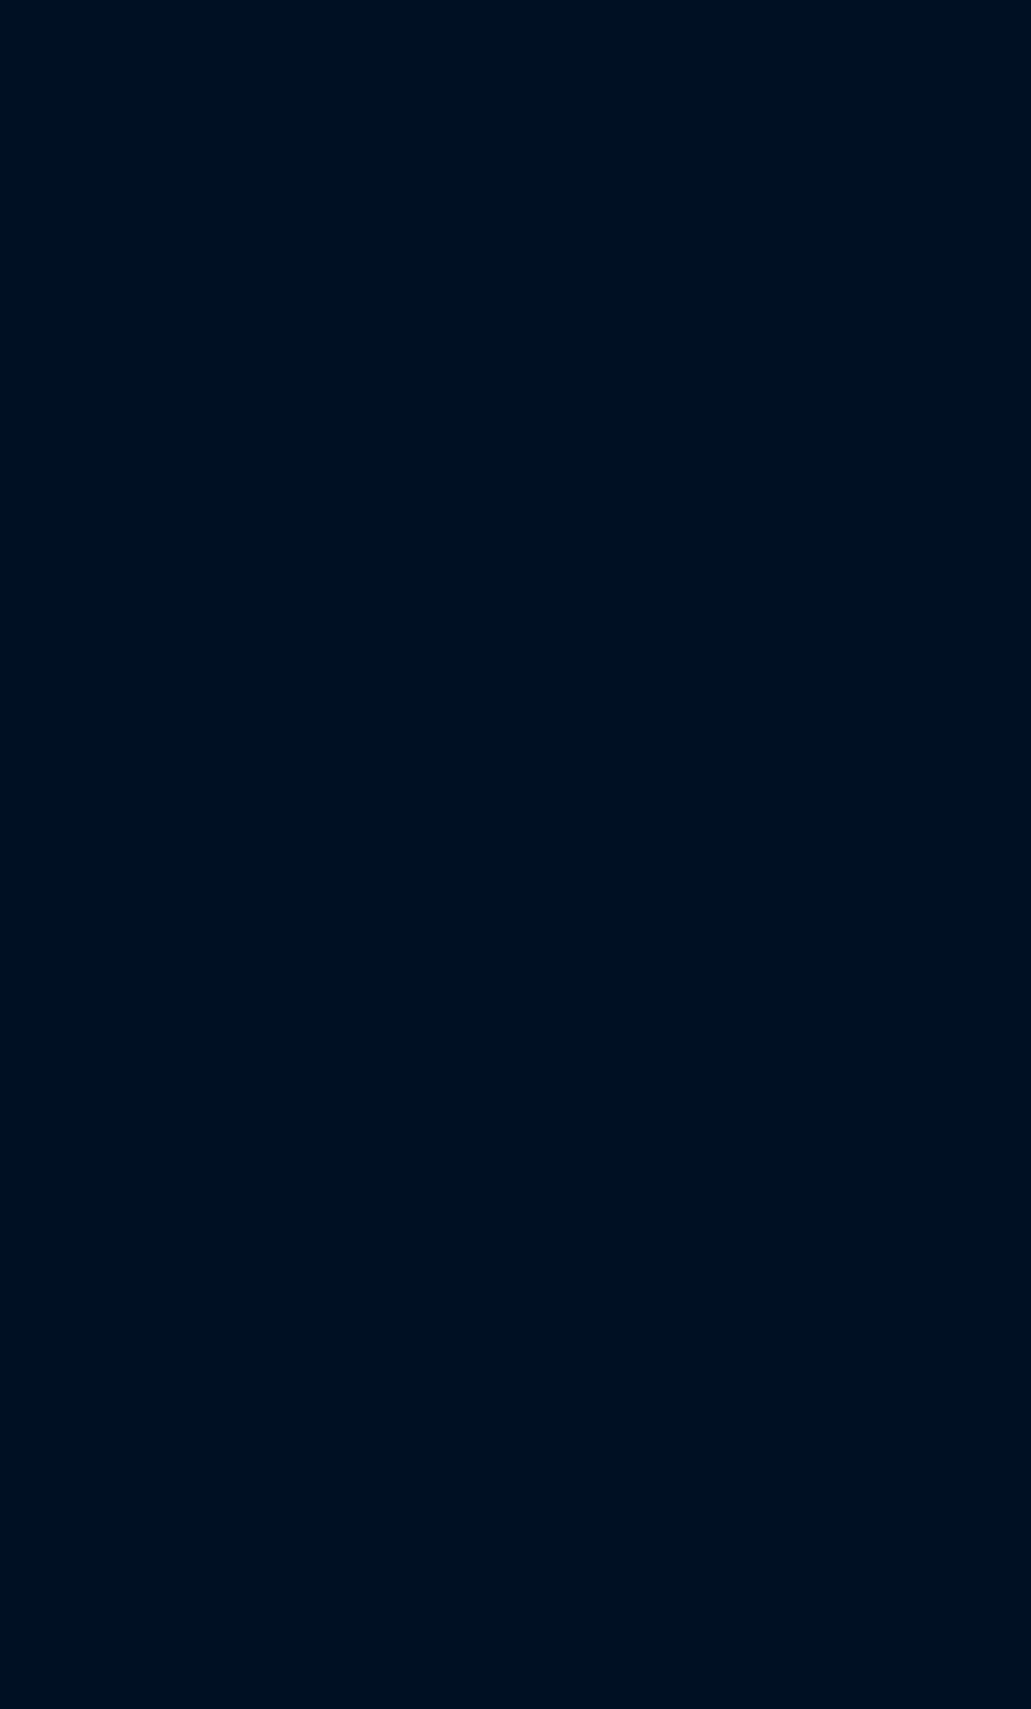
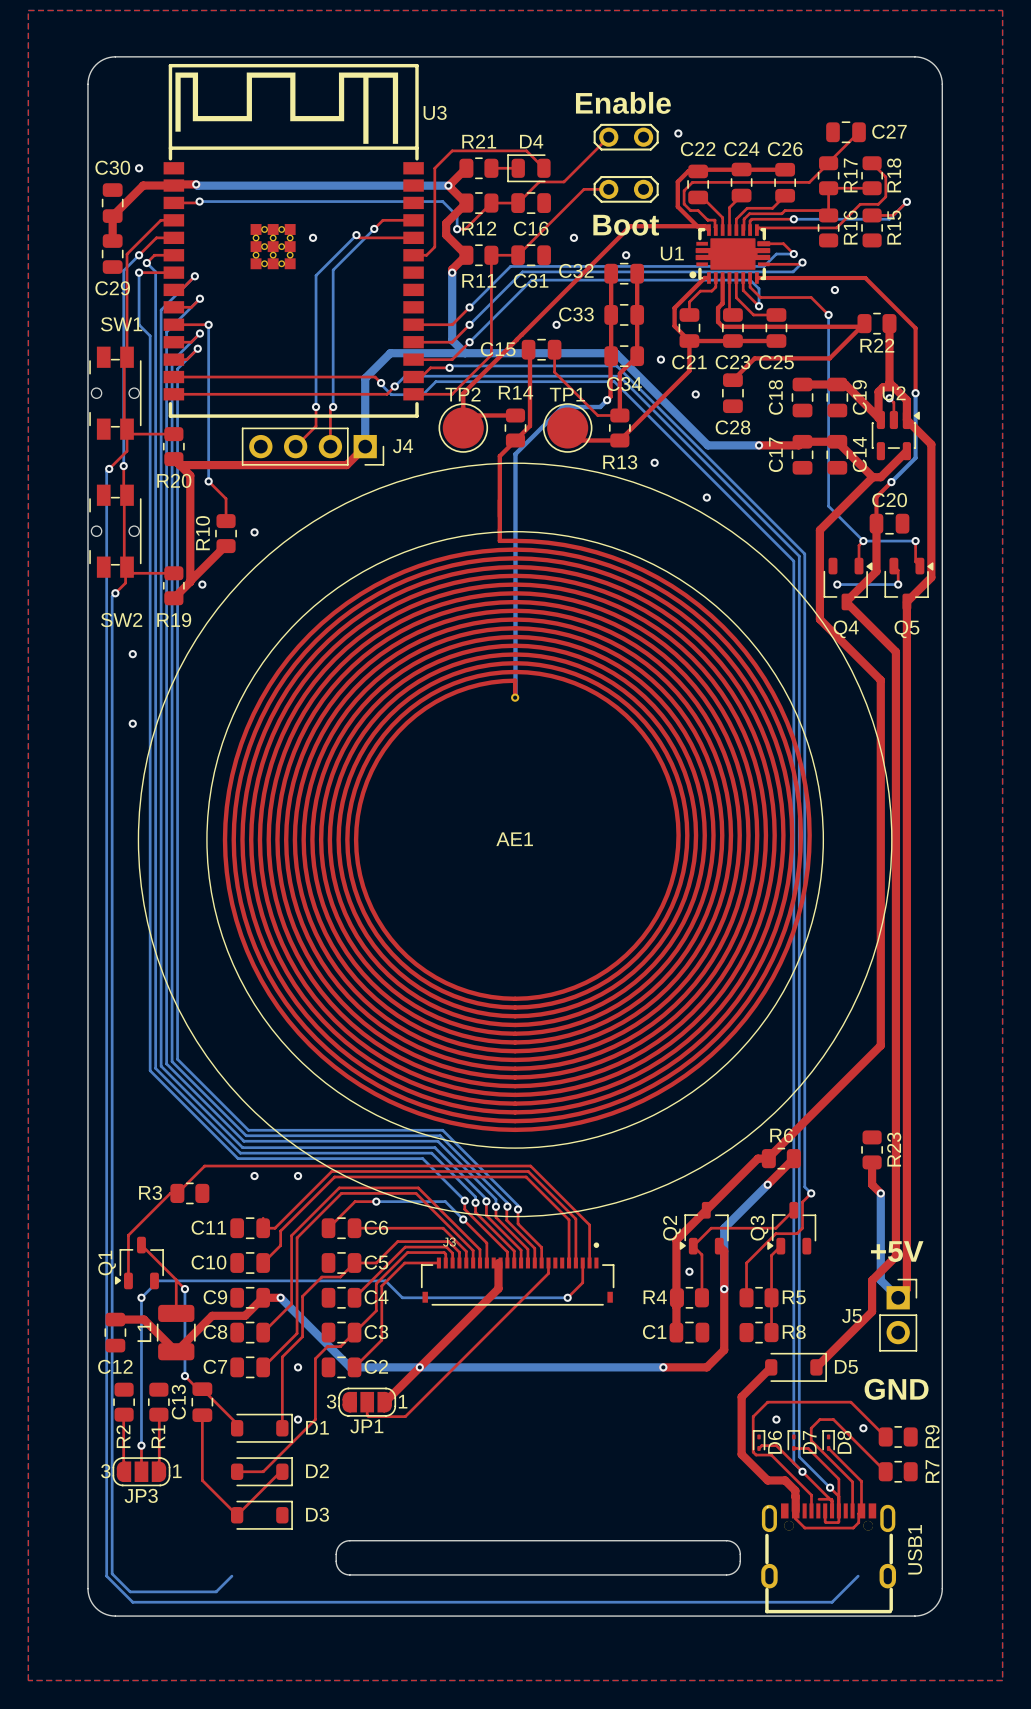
top zone outline: none -> (28, 10) (28, 1680) (1002, 1680) (1002, 10) (28, 10)
board edge: none -> (115, 56) (914, 56) (929, 61) (939, 72) (942, 84) (942, 1588) (938, 1603) (926, 1613) (914, 1616) (115, 1616) (100, 1611) (90, 1600) (87, 1588) (87, 84) (90, 72) (96, 64) (106, 58) (115, 56)
text: none -> Enable (623, 102)
C27: none -> (846, 132)
top track: none -> (859, 132) (809, 182) (692, 182) (684, 190) (684, 204) (690, 210) (698, 210) (707, 219)
via: none -> (678, 133)
top track: none -> (608, 137) (563, 181) (539, 181) (518, 203) (491, 203) (465, 229) (457, 229)
part: none -> (626, 137)
top track: none -> (872, 163) (885, 176) (885, 196) (878, 204) (860, 204) (836, 227) (759, 227) (756, 230)
via: none -> (139, 168)
top track: none -> (466, 168) (449, 185)
R21: none -> (478, 168)
top track: none -> (491, 168) (518, 168)
D4: none -> (528, 168)
top track: none -> (543, 168) (526, 150) (452, 150) (434, 168) (434, 247) (426, 255) (413, 255)
top track: none -> (785, 169) (699, 169) (688, 171) (677, 181) (677, 206) (697, 226)
R17: none -> (828, 175)
R18: none -> (872, 175)
C24: none -> (741, 182)
C26: none -> (785, 182)
top track: none -> (196, 184) (143, 185) (112, 216) (112, 241)
bottom track: none -> (196, 184) (448, 185)
via: none -> (196, 184)
C22: none -> (698, 184)
top track: none -> (448, 185) (466, 203) (446, 223) (446, 235) (466, 255) (452, 269) (452, 272)
via: none -> (448, 185)
top track: none -> (872, 188) (828, 188) (828, 215) (823, 210) (785, 210) (781, 213) (749, 213) (744, 219) (744, 230)
top track: none -> (608, 189) (583, 189) (518, 255) (491, 255) (491, 354) (452, 394) (413, 394)
part: none -> (626, 189)
top track: none -> (741, 195) (729, 207) (729, 230)
top track: none -> (785, 195) (772, 208) (747, 208) (736, 219) (736, 230)
top track: none -> (698, 197) (702, 197) (722, 217) (722, 230)
top track: none -> (199, 201) (173, 202)
bottom track: none -> (199, 201) (442, 201) (457, 215) (457, 229)
via: none -> (199, 201)
top track: none -> (906, 201) (893, 215) (872, 215)
bottom track: none -> (906, 201) (889, 219) (793, 219)
via: none -> (906, 201)
C30: none -> (112, 203)
R12: none -> (478, 203)
C16: none -> (531, 203)
top track: none -> (707, 219) (714, 220) (715, 227)
top track: none -> (793, 219) (751, 219) (750, 230)
via: none -> (793, 219)
top track: none -> (173, 220) (160, 220) (127, 254) (127, 357) (124, 359) (124, 426) (131, 434) (173, 434)
top track: none -> (413, 220) (382, 220) (374, 228)
text: none -> Boot (626, 225)
R16: none -> (828, 227)
R15: none -> (872, 227)
bottom track: none -> (374, 228) (333, 270) (333, 407)
via: none -> (374, 228)
via: none -> (457, 229)
top track: none -> (708, 230) (705, 226) (630, 226) (521, 334)
top track: none -> (356, 235) (359, 237) (413, 237)
bottom track: none -> (356, 235) (316, 275) (316, 407)
via: none -> (356, 235)
top track: none -> (173, 237) (156, 237) (139, 255)
via: none -> (313, 237)
via: none -> (573, 237)
U3: none -> (293, 240)
top track: none -> (763, 243) (783, 243) (793, 254)
C29: none -> (112, 254)
U1: none -> (729, 254)
bottom track: none -> (793, 254) (776, 254) (764, 266) (510, 266) (469, 307)
via: none -> (793, 254)
bottom track: none -> (139, 255) (123, 270) (123, 466)
via: none -> (139, 255)
top track: none -> (173, 255) (154, 255) (146, 263)
R11: none -> (478, 255)
C31: none -> (531, 255)
via: none -> (626, 255)
top track: none -> (802, 262) (800, 264) (763, 264)
bottom track: none -> (802, 262) (793, 271) (522, 271) (469, 324)
via: none -> (802, 262)
bottom track: none -> (146, 263) (155, 271) (155, 1068) (240, 1153) (431, 1153) (475, 1196) (475, 1202)
via: none -> (146, 263)
top track: none -> (139, 272) (173, 272)
bottom track: none -> (139, 272) (139, 324) (150, 335) (150, 1070) (238, 1158) (422, 1158) (464, 1200)
via: none -> (139, 272)
bottom track: none -> (452, 272) (452, 340) (465, 353)
via: none -> (452, 272)
top track: none -> (611, 273) (610, 396) (607, 400)
C32: none -> (624, 273)
top track: none -> (637, 273) (637, 356) (619, 373) (619, 415) (597, 415) (554, 372) (554, 349)
top track: none -> (194, 276) (181, 289) (173, 289)
bottom track: none -> (194, 276) (161, 310) (161, 1066) (242, 1147) (434, 1147) (486, 1199) (486, 1201)
via: none -> (194, 276)
top track: none -> (708, 278) (704, 278) (674, 308) (674, 326) (689, 341)
top track: none -> (715, 278) (715, 287) (711, 291) (700, 291) (689, 302) (689, 314)
top track: none -> (722, 278) (722, 303) (718, 308) (718, 321) (722, 326) (861, 326)
top track: none -> (729, 278) (729, 311) (732, 314)
top track: none -> (736, 278) (736, 297) (753, 314) (776, 314)
top track: none -> (743, 278) (743, 290) (759, 306)
top track: none -> (750, 278) (750, 287) (760, 297) (811, 297) (828, 314)
top track: none -> (756, 278) (865, 278) (915, 328) (915, 393)
via: none -> (834, 290)
top track: none -> (199, 298) (191, 307) (173, 307)
bottom track: none -> (199, 298) (166, 332) (166, 1063) (243, 1141) (437, 1141) (495, 1199) (495, 1206)
via: none -> (199, 298)
bottom track: none -> (759, 306) (759, 288) (750, 280) (531, 280) (469, 342)
via: none -> (759, 306)
top track: none -> (469, 307) (452, 324) (413, 324)
via: none -> (469, 307)
C33: none -> (624, 314)
bottom track: none -> (828, 314) (828, 506) (863, 541) (915, 541)
via: none -> (828, 314)
top track: none -> (864, 323) (829, 358) (754, 358) (732, 380) (727, 374)
R22: none -> (877, 323)
top track: none -> (889, 323) (889, 382) (906, 400) (906, 419) (931, 444) (931, 577) (906, 601) (906, 1289) (898, 1297)
top track: none -> (173, 324) (208, 324)
bottom track: none -> (208, 324) (208, 481)
via: none -> (208, 324)
top track: none -> (469, 324) (452, 342) (413, 342)
via: none -> (469, 324)
via: none -> (556, 324)
C21: none -> (689, 328)
C23: none -> (732, 328)
C25: none -> (776, 328)
top track: none -> (199, 333) (191, 342) (173, 342)
bottom track: none -> (199, 333) (172, 361) (172, 1061) (246, 1135) (440, 1135) (507, 1203) (507, 1206)
via: none -> (199, 333)
top track: none -> (521, 334) (516, 339)
top track: none -> (516, 339) (463, 393) (463, 427) (475, 415) (515, 415)
top track: none -> (689, 341) (689, 370) (619, 440) (580, 440) (567, 427)
top track: none -> (689, 341) (776, 341)
top track: none -> (469, 342) (452, 359) (413, 359)
via: none -> (469, 342)
top track: none -> (197, 348) (186, 359) (173, 359)
bottom track: none -> (197, 348) (177, 368) (177, 1059) (248, 1130) (442, 1130) (518, 1205) (518, 1209)
via: none -> (197, 348)
top track: none -> (528, 349) (530, 425) (499, 456) (499, 516)
C15: none -> (541, 349)
C34: none -> (624, 356)
via: none -> (660, 359)
top track: none -> (449, 367) (430, 367) (421, 377) (413, 377)
bottom track: none -> (449, 367) (451, 365) (616, 365) (804, 553) (804, 1186) (811, 1193)
via: none -> (449, 367)
top track: none -> (173, 377) (375, 377) (381, 383)
bottom track: none -> (381, 383) (391, 394) (422, 394) (435, 381) (614, 381) (793, 561) (793, 1463) (802, 1471)
via: none -> (381, 383)
top track: none -> (802, 384) (845, 384) (880, 419)
bottom track: none -> (391, 386) (394, 386) (405, 376) (619, 376) (799, 556) (799, 1456) (830, 1487)
top track: none -> (394, 386) (387, 394) (173, 394)
via: none -> (394, 386)
top track: none -> (894, 387) (883, 387) (878, 391) (878, 417)
SW1: none -> (115, 393)
C28: none -> (732, 393)
bottom track: none -> (915, 393) (915, 457) (891, 482)
via: none -> (915, 393)
via: none -> (695, 394)
C18: none -> (802, 397)
C19: none -> (837, 397)
top track: none -> (889, 398) (893, 402) (893, 419)
via: none -> (889, 398)
bottom track: none -> (607, 400) (600, 407) (562, 407) (515, 454) (515, 697)
via: none -> (607, 400)
top track: none -> (316, 407) (316, 426) (295, 446)
via: none -> (316, 407)
top track: none -> (333, 407) (330, 409) (330, 446)
via: none -> (333, 407)
TP2: none -> (463, 427)
R14: none -> (515, 427)
TP1: none -> (567, 427)
R13: none -> (619, 427)
top track: none -> (127, 429) (127, 451) (109, 468)
U2: none -> (895, 435)
top track: none -> (759, 445) (798, 445) (802, 441) (837, 441) (872, 477)
bottom track: none -> (759, 445) (707, 445) (615, 353) (390, 353) (365, 378) (365, 446)
via: none -> (759, 445)
R20: none -> (173, 446)
J4: none -> (313, 446)
top track: none -> (365, 446) (346, 465) (179, 465)
top track: none -> (906, 451) (880, 477) (872, 477)
C17: none -> (802, 454)
C14: none -> (837, 454)
top track: none -> (173, 459) (190, 475) (190, 581) (173, 598)
drawing: none -> [137, 462, 893, 1218]
via: none -> (654, 462)
top track: none -> (123, 466) (123, 491) (127, 495) (124, 497) (124, 564) (133, 573) (173, 573)
via: none -> (123, 466)
bottom track: none -> (109, 468) (106, 471) (106, 1576) (132, 1602) (832, 1602) (858, 1576)
via: none -> (109, 468)
top track: none -> (872, 477) (819, 530) (819, 619) (880, 680) (880, 1045) (768, 1158) (757, 1158) (676, 1240) (676, 1332)
top track: none -> (208, 481) (226, 498) (226, 521)
via: none -> (208, 481)
top track: none -> (891, 482) (876, 497) (876, 571) (846, 601) (895, 651) (895, 1256) (872, 1280) (872, 1311) (816, 1367)
via: none -> (891, 482)
via: none -> (706, 497)
C20: none -> (889, 523)
SW2: none -> (115, 531)
via: none -> (254, 532)
R10: none -> (226, 533)
top track: none -> (863, 541) (859, 545) (859, 566)
via: none -> (863, 541)
top track: none -> (915, 541) (915, 561) (919, 566)
via: none -> (915, 541)
top track: none -> (226, 546) (190, 581)
top track: none -> (893, 566) (898, 570) (898, 584)
top track: none -> (127, 567) (125, 583) (115, 593)
via: none -> (202, 584)
bottom track: none -> (837, 584) (898, 584)
via: none -> (837, 584)
Q4: none -> (848, 584)
via: none -> (898, 584)
Q5: none -> (908, 584)
R19: none -> (173, 585)
bottom track: none -> (115, 593) (112, 596) (112, 1573) (130, 1591) (216, 1591) (231, 1576)
via: none -> (115, 593)
via: none -> (132, 654)
via: none -> (132, 723)
AE1: none -> (517, 815)
R23: none -> (872, 1149)
R6: none -> (781, 1158)
top track: none -> (793, 1158) (767, 1184)
top track: none -> (872, 1162) (872, 1184) (880, 1193)
via: none -> (254, 1176)
via: none -> (298, 1176)
bottom track: none -> (767, 1184) (724, 1228) (724, 1289)
via: none -> (767, 1184)
R3: none -> (189, 1193)
top track: none -> (811, 1193) (802, 1202) (802, 1228) (797, 1233) (775, 1233) (746, 1263) (746, 1297)
via: none -> (811, 1193)
bottom track: none -> (880, 1193) (880, 1280) (898, 1297)
via: none -> (880, 1193)
top track: none -> (464, 1200) (464, 1209) (507, 1251) (507, 1263)
via: none -> (464, 1200)
top track: none -> (376, 1201) (355, 1201) (328, 1228)
bottom track: none -> (376, 1201) (445, 1201) (463, 1219)
via: none -> (376, 1201)
top track: none -> (486, 1201) (486, 1215) (521, 1250) (521, 1263)
via: none -> (486, 1201)
top track: none -> (475, 1202) (475, 1212) (514, 1251) (514, 1263)
via: none -> (475, 1202)
top track: none -> (495, 1206) (495, 1217) (527, 1249) (527, 1263)
via: none -> (495, 1206)
top track: none -> (507, 1206) (506, 1220) (534, 1248) (534, 1263)
via: none -> (507, 1206)
top track: none -> (518, 1209) (518, 1223) (541, 1247) (541, 1263)
via: none -> (518, 1209)
top track: none -> (793, 1210) (775, 1228) (711, 1228) (693, 1246) (701, 1254) (701, 1297)
top track: none -> (263, 1218) (263, 1228) (275, 1228) (331, 1171) (528, 1171) (575, 1219) (575, 1263)
top track: none -> (463, 1219) (486, 1243) (486, 1263)
via: none -> (463, 1219)
C11: none -> (250, 1228)
C6: none -> (341, 1228)
top track: none -> (354, 1228) (443, 1228) (466, 1251) (466, 1263)
Q2: none -> (704, 1228)
Q3: none -> (791, 1228)
top track: none -> (141, 1245) (176, 1279) (176, 1313)
top track: none -> (719, 1246) (724, 1251) (724, 1349) (706, 1367) (663, 1367)
top track: none -> (780, 1246) (771, 1255) (771, 1332)
text: none -> +5V (897, 1251)
Q1: none -> (139, 1263)
C10: none -> (250, 1263)
top track: none -> (263, 1263) (280, 1245) (280, 1231) (334, 1176) (526, 1176) (569, 1219) (569, 1263)
C5: none -> (341, 1263)
top track: none -> (438, 1263) (404, 1263) (381, 1286) (381, 1340) (354, 1367)
top track: none -> (445, 1263) (444, 1252) (407, 1252) (376, 1283) (376, 1310) (340, 1346) (327, 1346) (315, 1358) (315, 1419) (263, 1471) (237, 1471)
top track: none -> (452, 1263) (452, 1253) (446, 1247) (405, 1247) (354, 1297)
top track: none -> (459, 1263) (459, 1252) (448, 1241) (397, 1241) (376, 1263) (354, 1263) (340, 1277) (321, 1277) (302, 1296) (302, 1336) (282, 1356) (282, 1428)
top track: none -> (473, 1263) (473, 1250) (416, 1193) (341, 1193) (297, 1237) (297, 1333) (263, 1367)
top track: none -> (480, 1263) (480, 1249) (418, 1187) (339, 1187) (291, 1235) (291, 1304) (263, 1332)
top track: none -> (498, 1263) (498, 1288) (385, 1402)
top track: none -> (548, 1263) (548, 1273) (405, 1416) (368, 1416) (367, 1402)
top track: none -> (582, 1263) (582, 1282) (567, 1297)
top track: none -> (589, 1263) (589, 1224) (530, 1166) (204, 1166) (177, 1193) (170, 1193) (128, 1235) (128, 1280)
via: none -> (689, 1271)
J3: none -> (517, 1274)
top track: none -> (176, 1280) (184, 1289)
bottom track: none -> (184, 1289) (184, 1376)
via: none -> (184, 1289)
via: none -> (724, 1289)
via: none -> (141, 1297)
C9: none -> (250, 1297)
top track: none -> (280, 1297) (263, 1297) (245, 1315) (212, 1315) (176, 1351) (144, 1319) (115, 1319)
bottom track: none -> (280, 1297) (350, 1367) (663, 1367)
via: none -> (280, 1297)
C4: none -> (341, 1297)
bottom track: none -> (567, 1297) (402, 1297) (385, 1280) (158, 1280) (141, 1297) (141, 1445)
via: none -> (567, 1297)
R4: none -> (689, 1297)
R5: none -> (759, 1297)
J5: none -> (898, 1315)
C12: none -> (115, 1332)
L1: none -> (176, 1332)
C8: none -> (250, 1332)
C3: none -> (341, 1332)
C1: none -> (689, 1332)
R8: none -> (759, 1332)
C7: none -> (250, 1367)
via: none -> (298, 1367)
C2: none -> (341, 1367)
via: none -> (419, 1367)
via: none -> (663, 1367)
top track: none -> (771, 1367) (741, 1396) (741, 1454) (767, 1480) (785, 1480) (795, 1490) (795, 1518) (804, 1528) (853, 1528) (858, 1522) (858, 1513) (861, 1510) (861, 1481) (828, 1448)
D5: none -> (796, 1367)
top track: none -> (184, 1376) (198, 1389) (202, 1389) (237, 1423) (237, 1428)
via: none -> (184, 1376)
text: none -> GND (896, 1389)
R2: none -> (124, 1402)
R1: none -> (158, 1402)
C13: none -> (202, 1402)
JP1: none -> (367, 1402)
top track: none -> (124, 1414) (123, 1471)
top track: none -> (158, 1414) (159, 1471)
top track: none -> (202, 1415) (202, 1480) (237, 1515) (282, 1471)
via: none -> (298, 1419)
via: none -> (776, 1419)
D1: none -> (261, 1428)
via: none -> (863, 1428)
top track: none -> (885, 1436) (850, 1402) (767, 1402) (753, 1416) (753, 1452) (756, 1455) (771, 1455) (811, 1495) (811, 1510)
R9: none -> (898, 1436)
D6: none -> (759, 1440)
D7: none -> (793, 1440)
D8: none -> (828, 1440)
top track: none -> (141, 1445) (141, 1471)
via: none -> (141, 1445)
top track: none -> (759, 1448) (761, 1445) (776, 1445) (832, 1501)
top track: none -> (793, 1448) (808, 1448) (838, 1479) (838, 1521) (825, 1522) (825, 1510)
JP3: none -> (141, 1471)
D2: none -> (261, 1471)
via: none -> (802, 1471)
top track: none -> (885, 1471) (833, 1419) (819, 1419) (811, 1428) (811, 1440) (852, 1481) (852, 1510)
R7: none -> (898, 1471)
top track: none -> (830, 1487) (838, 1496)
via: none -> (830, 1487)
top track: none -> (819, 1499) (831, 1499) (832, 1510)
D3: none -> (261, 1515)
board edge: none -> (349, 1540) (726, 1540) (732, 1542) (738, 1547) (740, 1561) (736, 1570) (726, 1574) (349, 1574) (340, 1570) (336, 1561) (338, 1547) (342, 1542) (349, 1540)
USB1: none -> (828, 1558)

